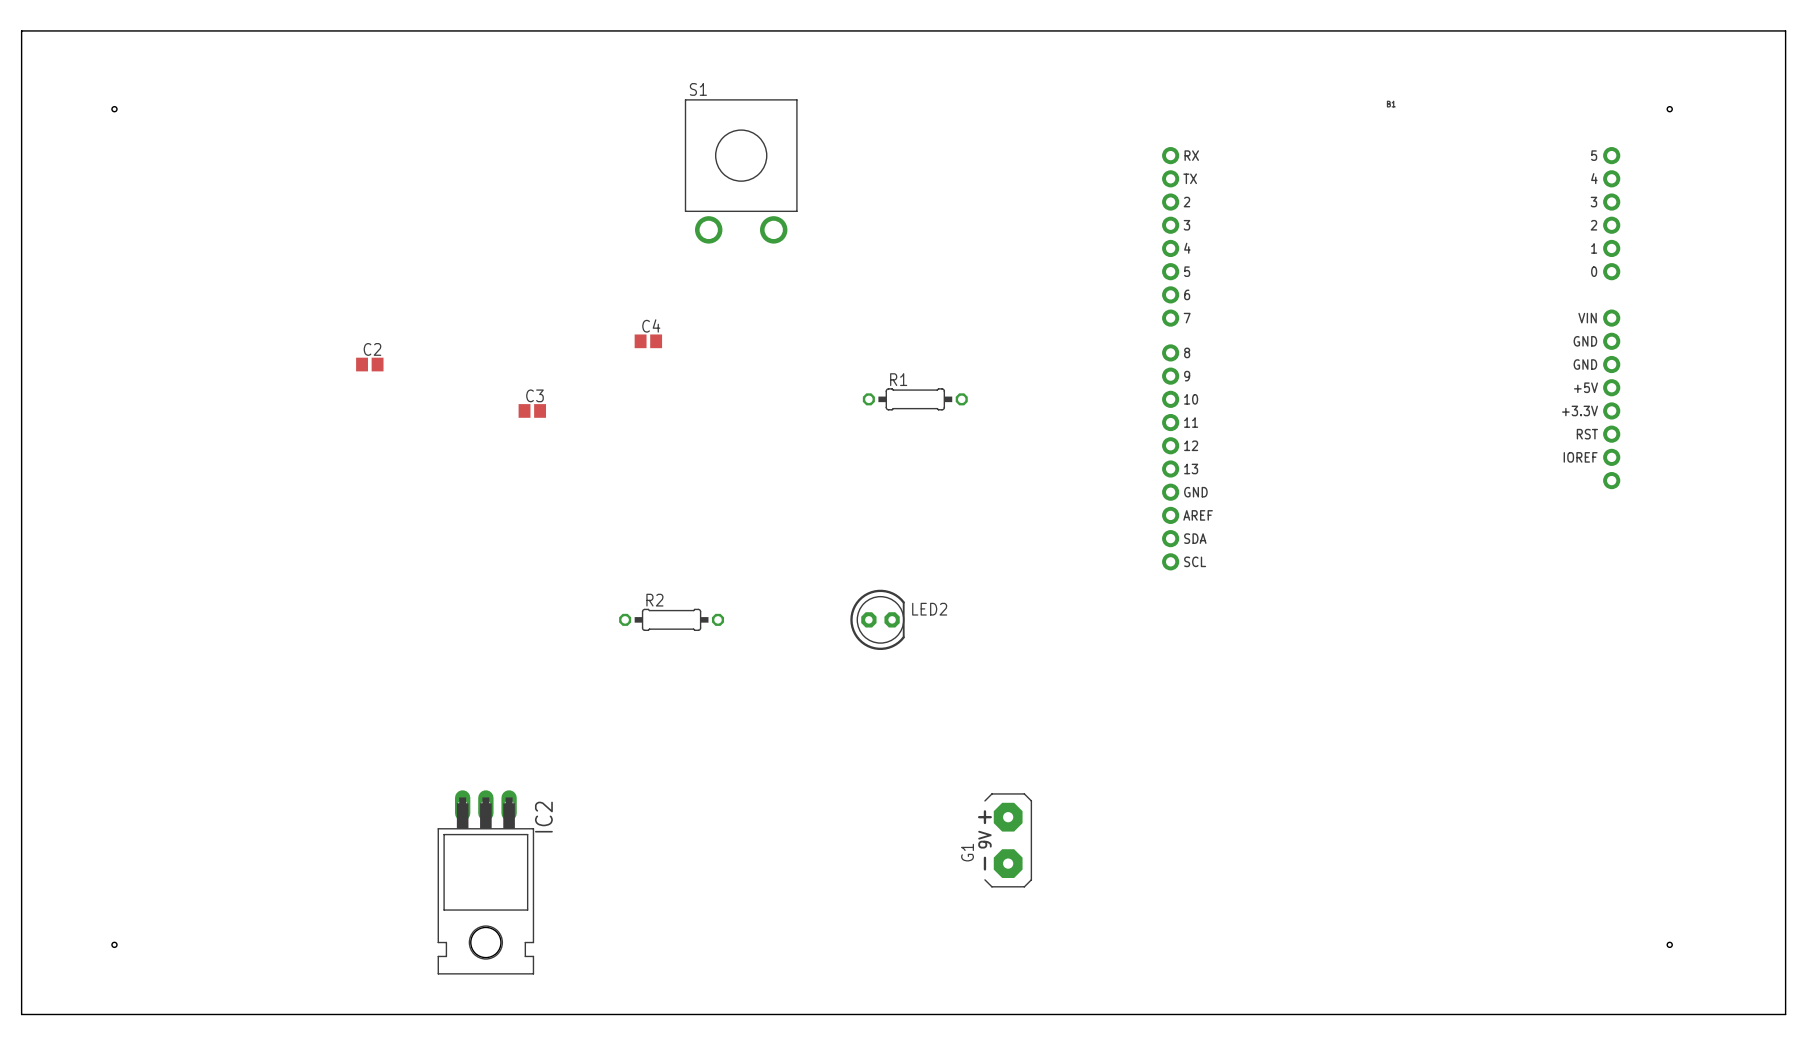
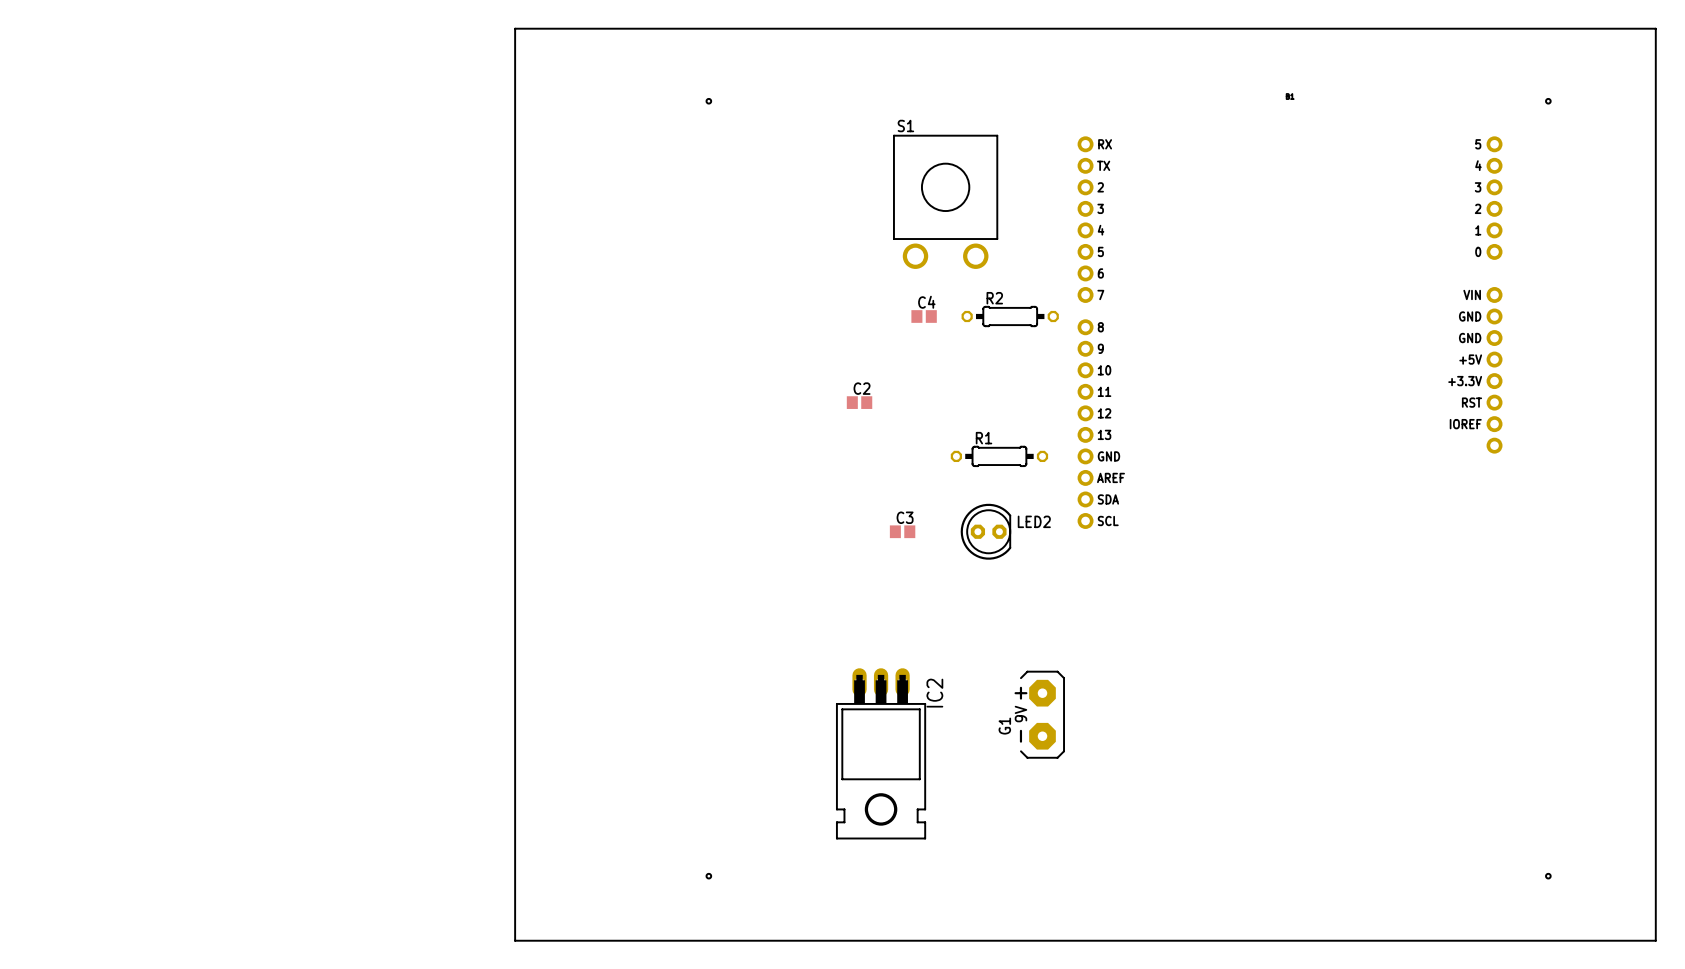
board edge: (555, 30) (21, 30) (21, 1014) (555, 1014) -> (515, 28) (515, 940)
hole: (114, 109) -> none
hole: none -> (708, 101)
S1 position: (741, 171) -> (945, 202)
C4 position: (648, 341) -> (924, 316)
C2 position: (369, 364) -> (859, 402)
R1 position: (915, 399) -> (999, 456)
C3 position: (532, 410) -> (902, 531)
R2 position: (671, 619) -> (1010, 316)
LED2 position: (877, 619) -> (985, 531)
G1 position: (1005, 840) -> (1039, 714)
IC2 position: (485, 882) -> (881, 753)
hole: (114, 944) -> none
hole: none -> (708, 876)

